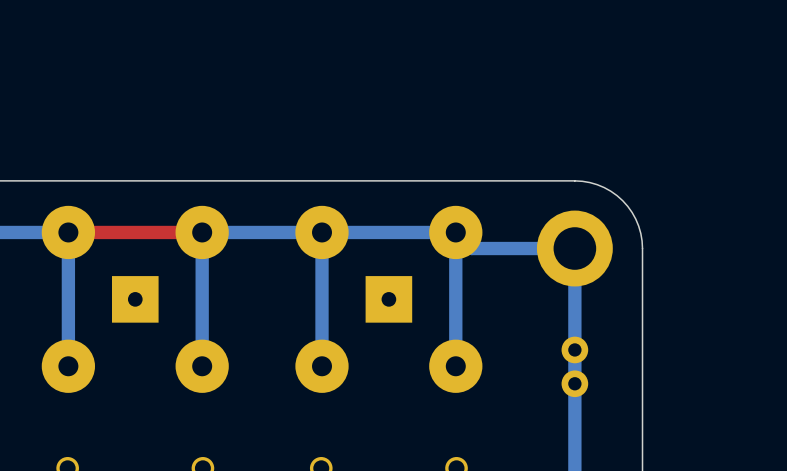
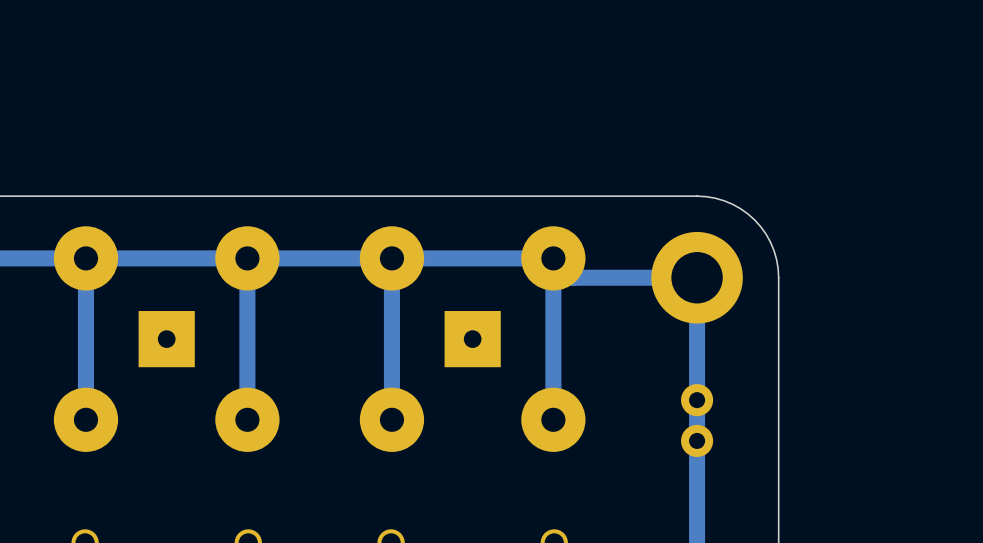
top track: (202, 232) (68, 232) -> none
bottom track: none -> (247, 258) (85, 258)

